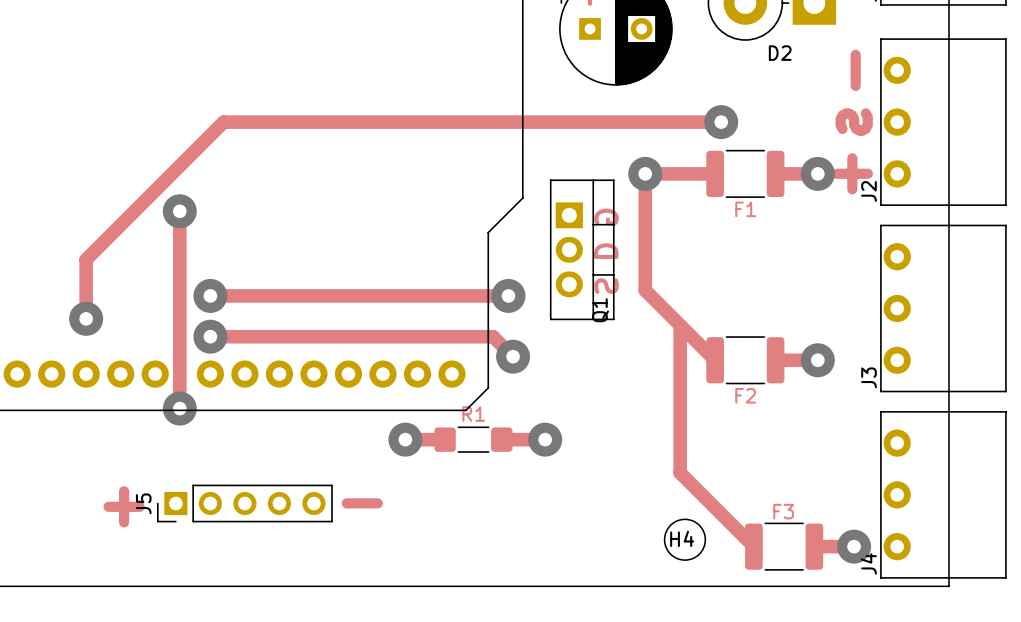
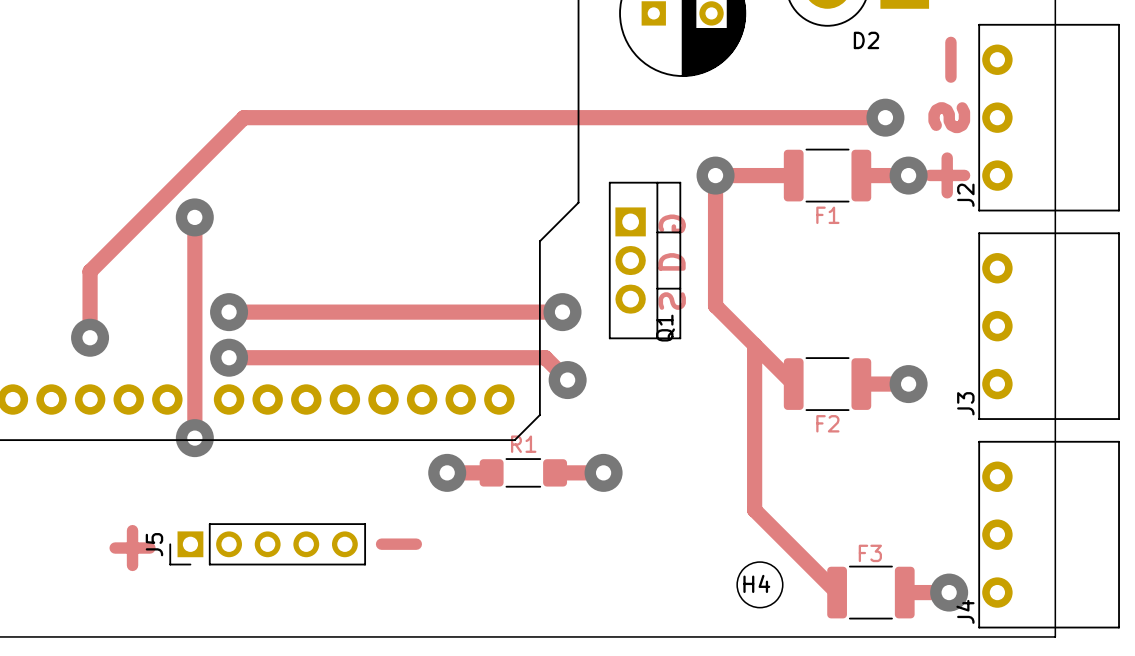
track: none -> (800, 117) (885, 117)
via position: (721, 122) -> (885, 117)

